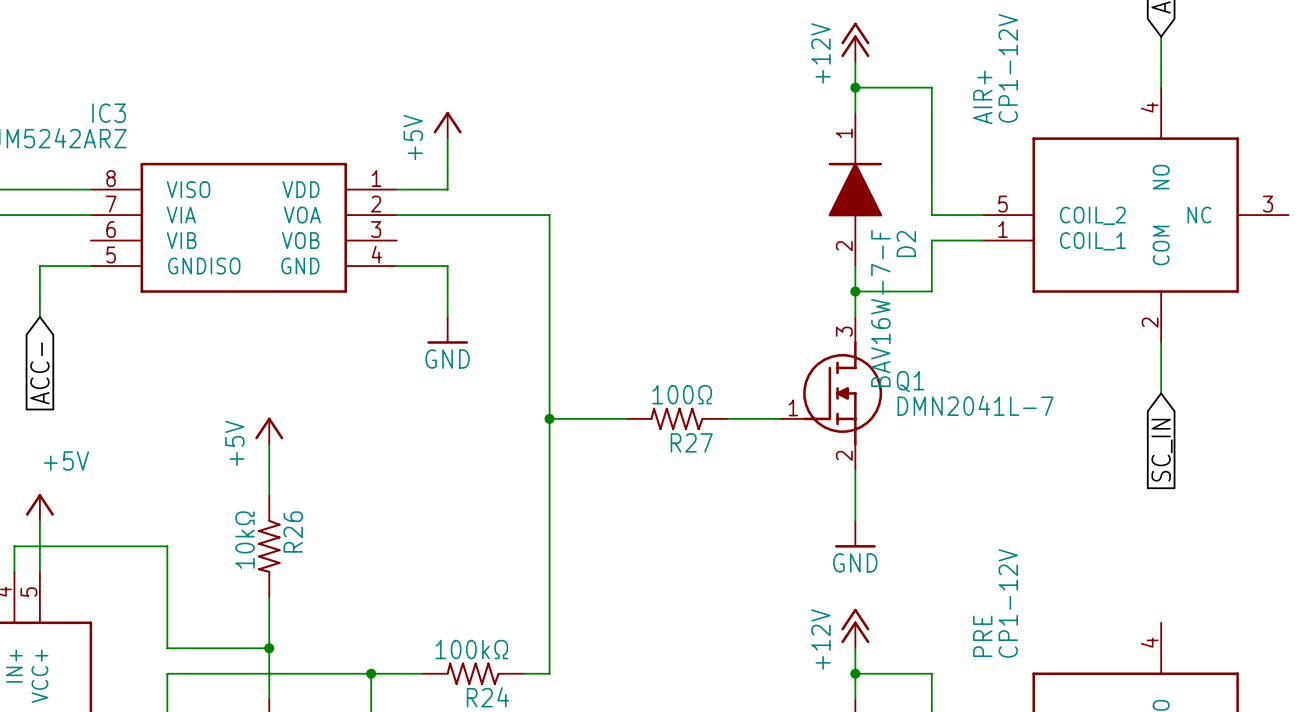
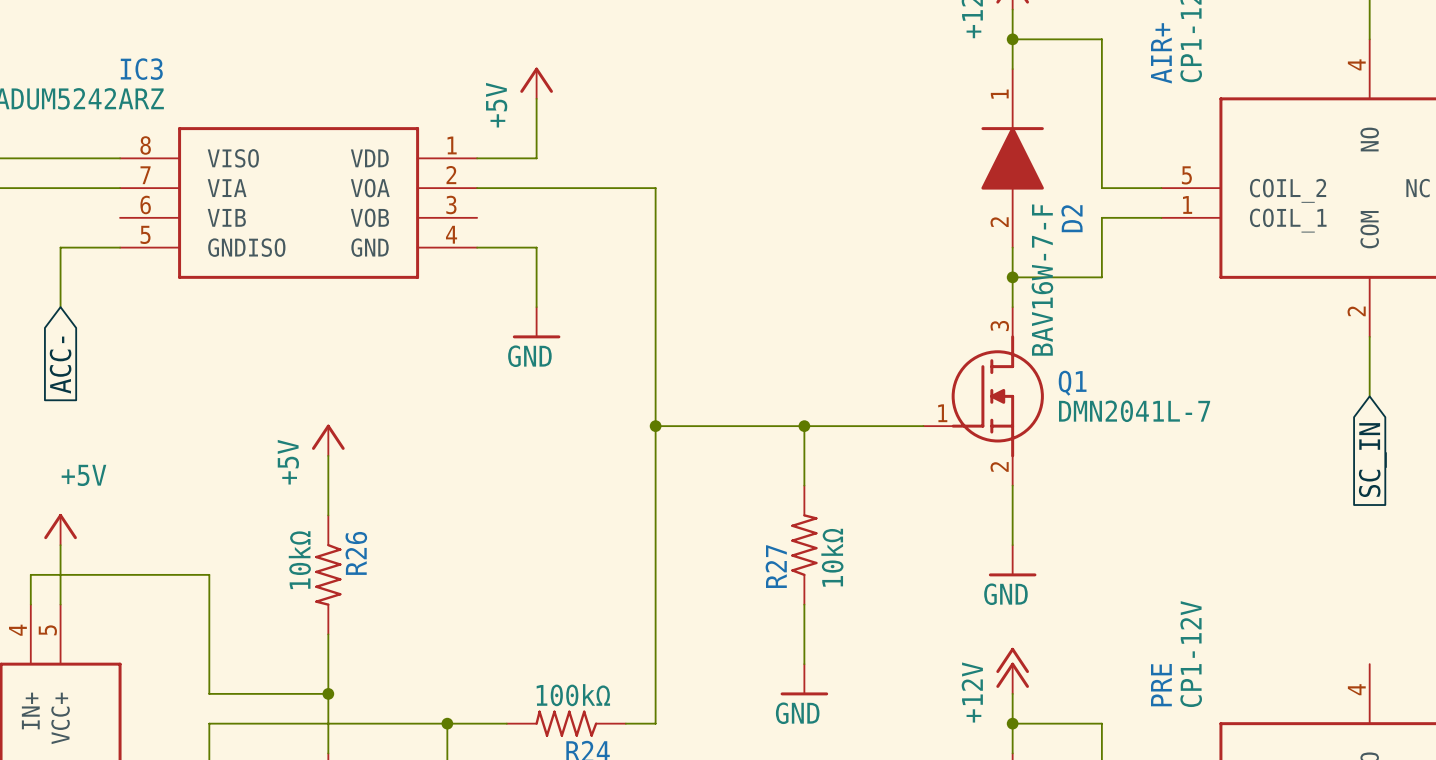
R27 value: 100Ω (682, 394) -> 10kΩ (832, 557)
wire: none -> (804, 426) (804, 485)
R27 rotation: 0° (676, 418) -> 90° clockwise (804, 545)
R27 position: (676, 418) -> (804, 545)
junction: none -> (804, 426)
wire: none -> (804, 604) (804, 664)
power symbol: none -> GND (804, 679)

